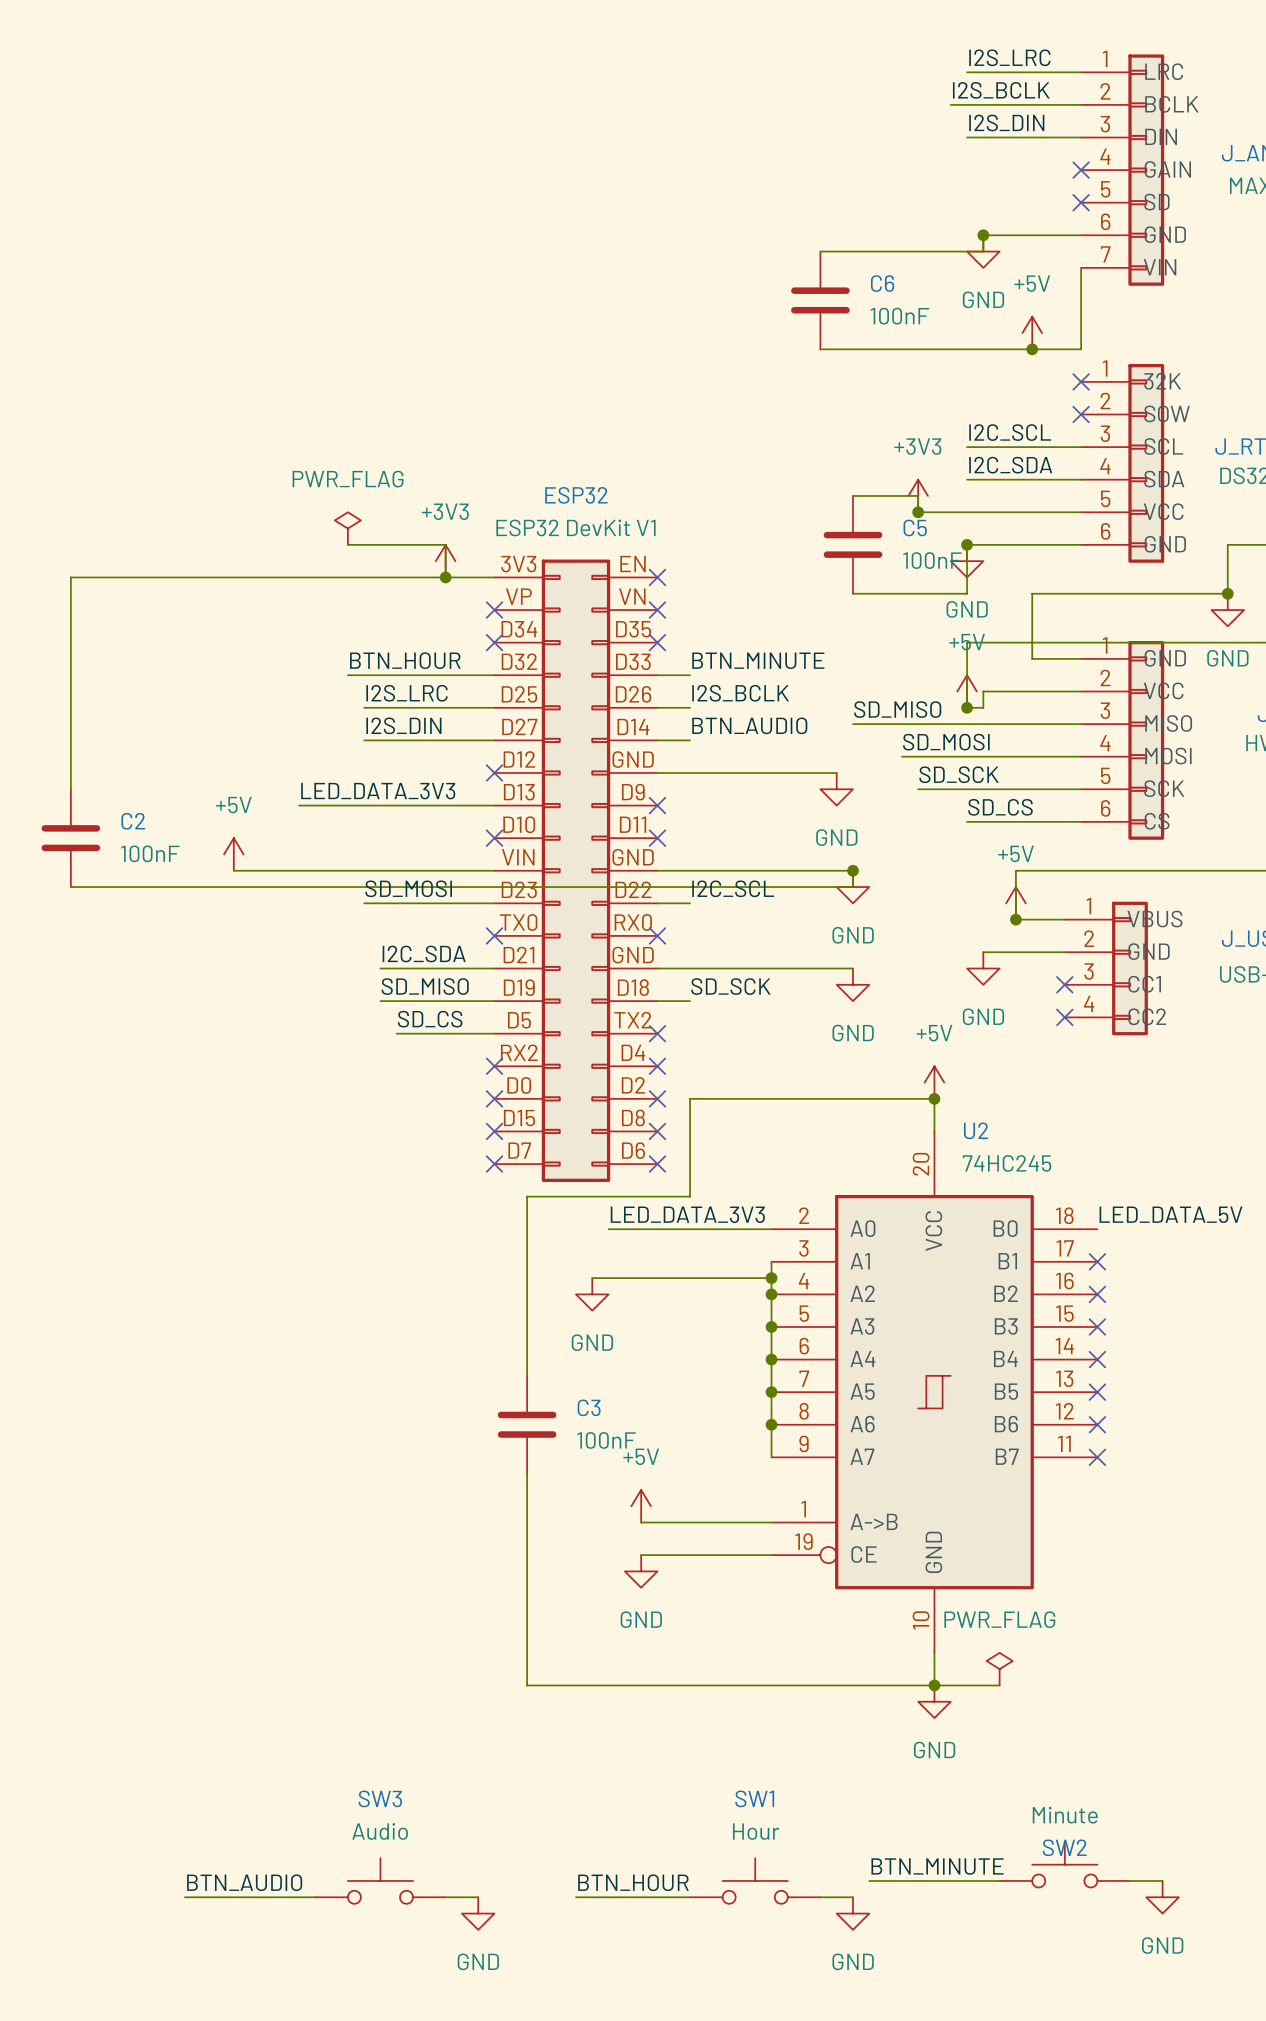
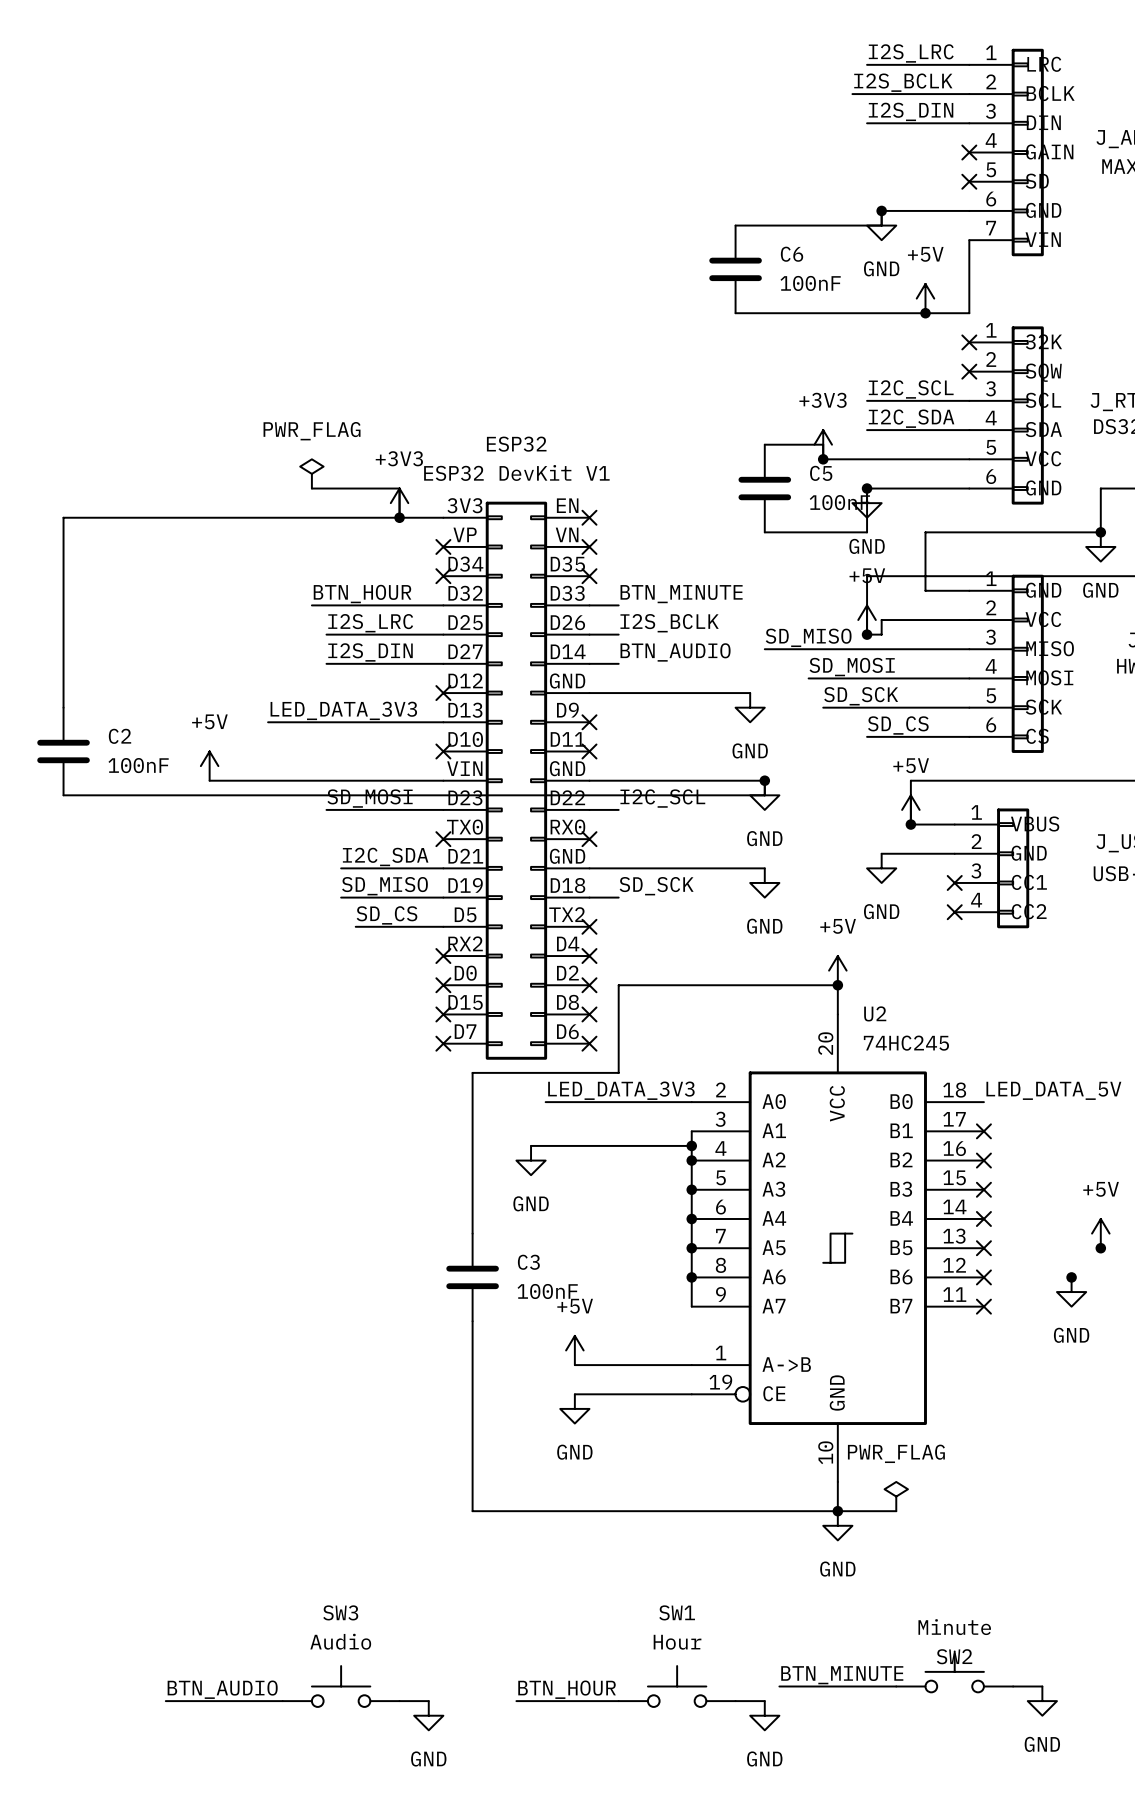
power symbol: none -> +5V (1100, 1233)
junction: none -> (1100, 1248)
junction: none -> (1071, 1277)
power symbol: none -> GND (1071, 1292)

